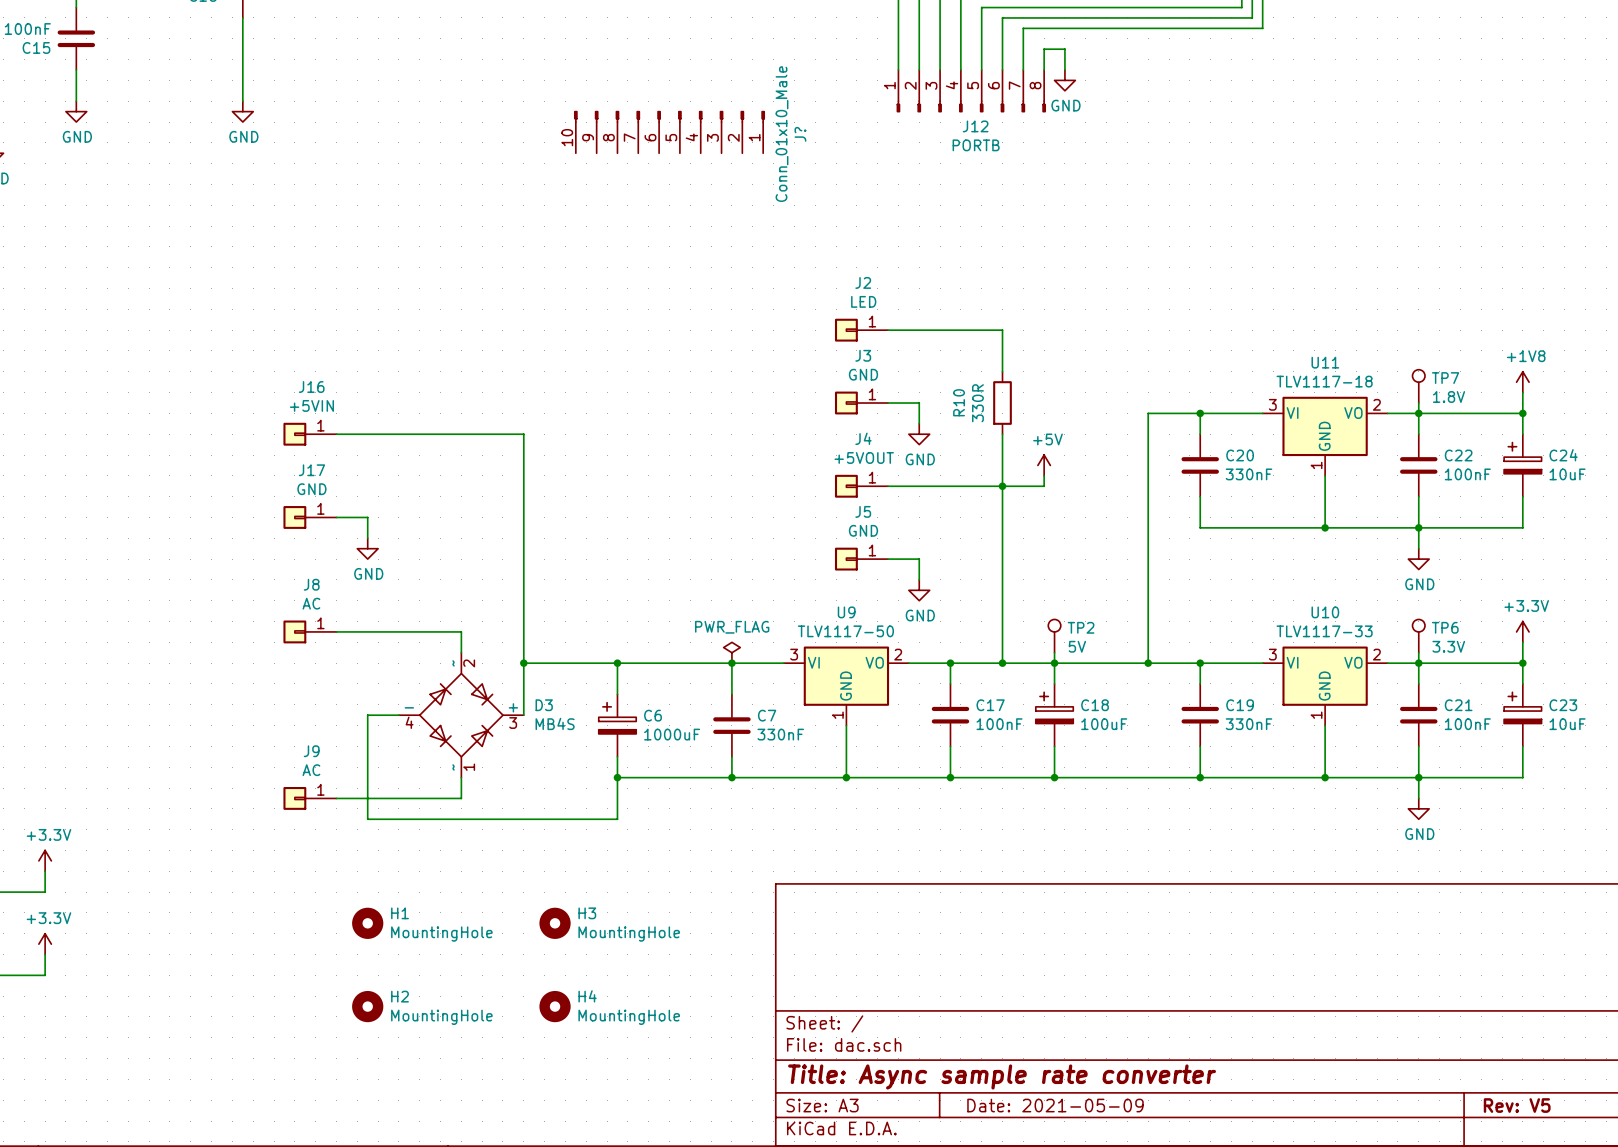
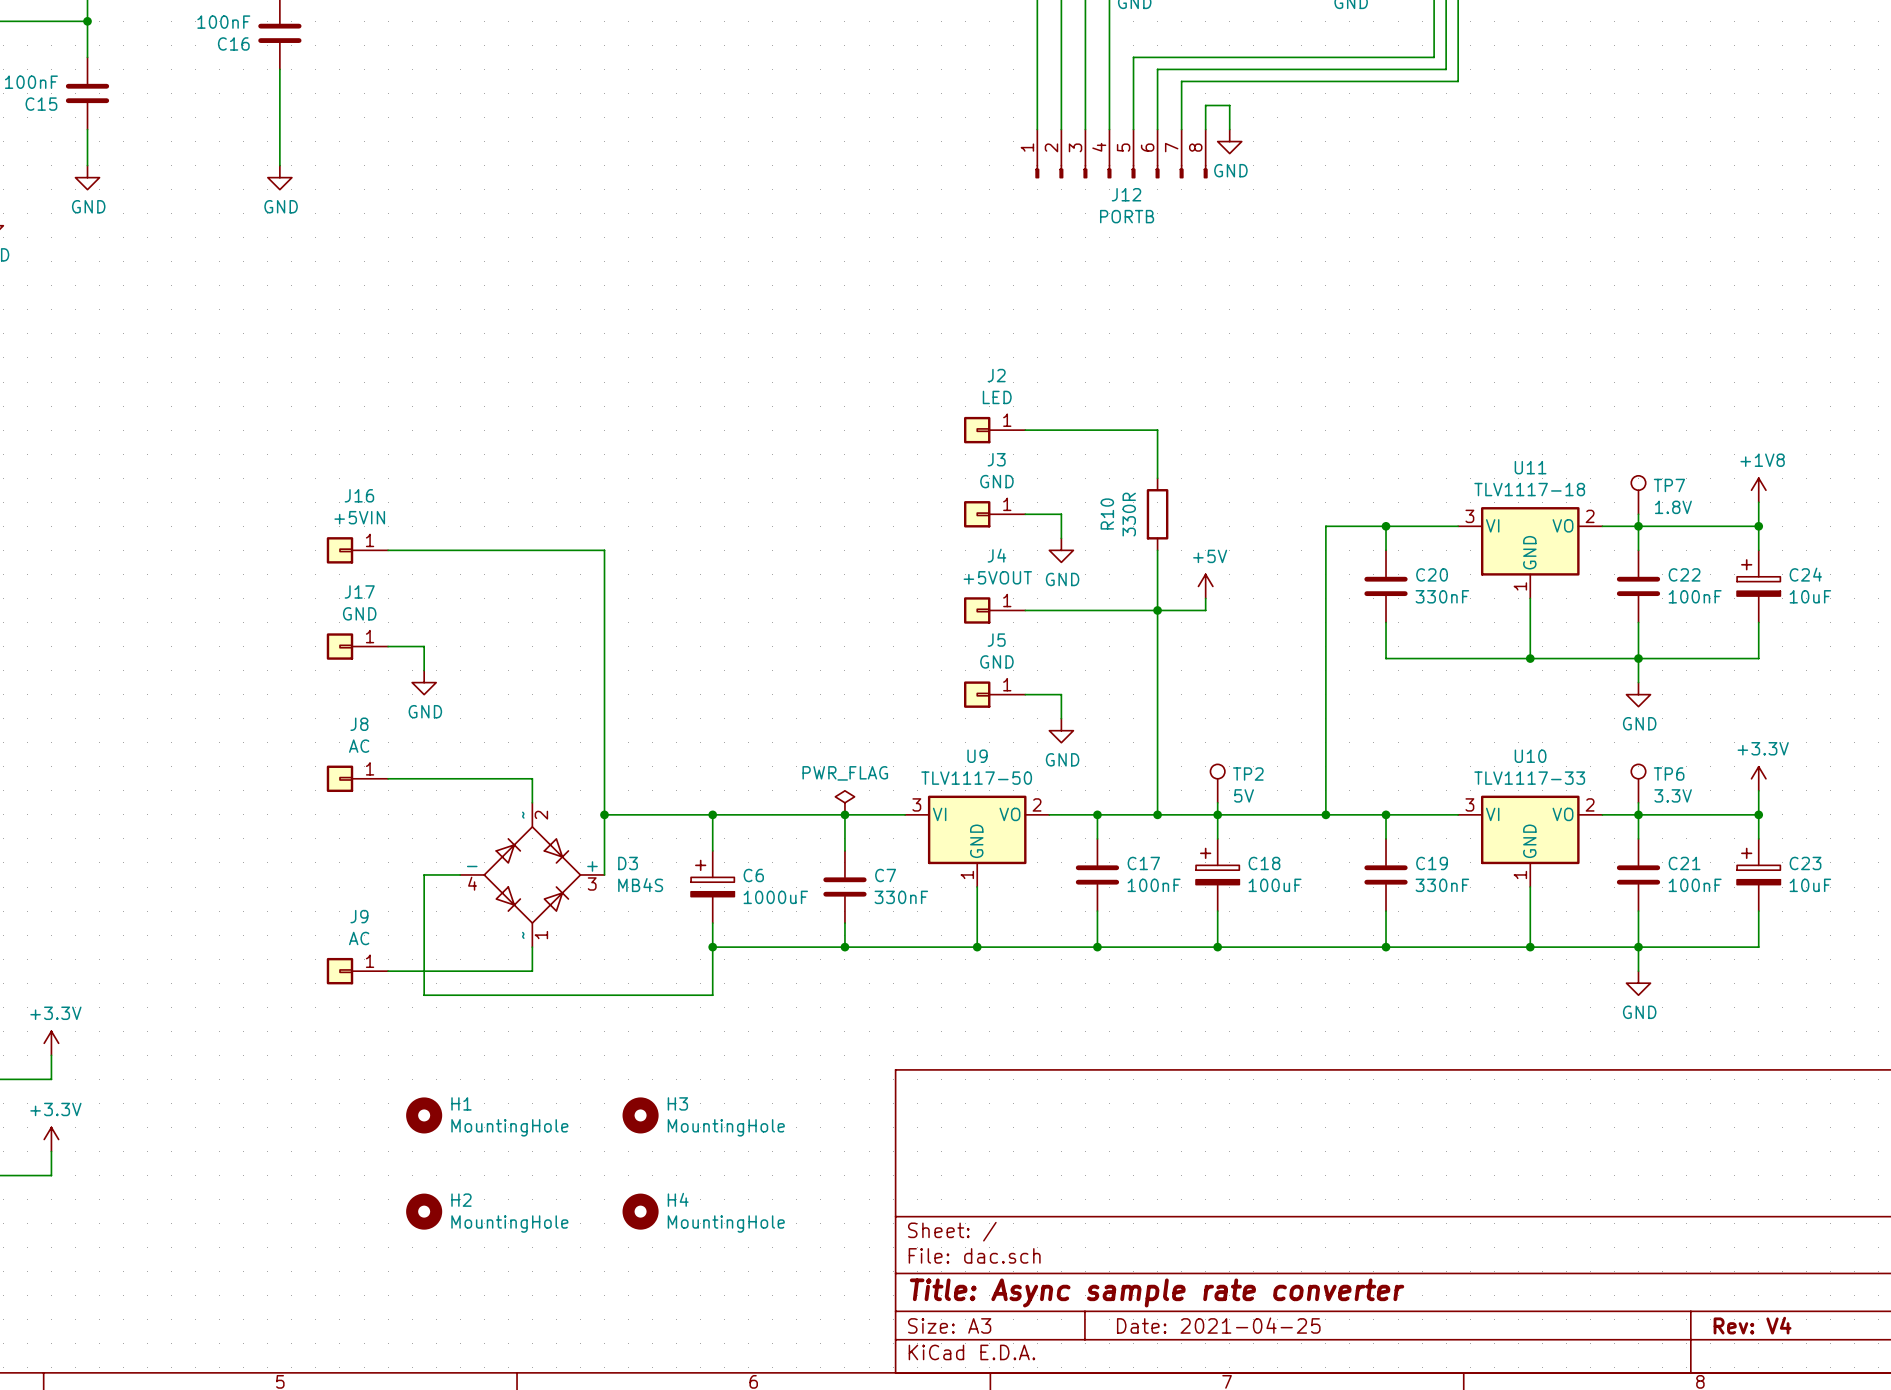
J?: Conn_01x10_Male (669, 132) -> none
title block: Date: 2021-05-09 (1055, 1105) -> Date: 2021-04-25 (1218, 1325)
title block: Rev: V5 (1517, 1105) -> Rev: V4 (1752, 1325)

